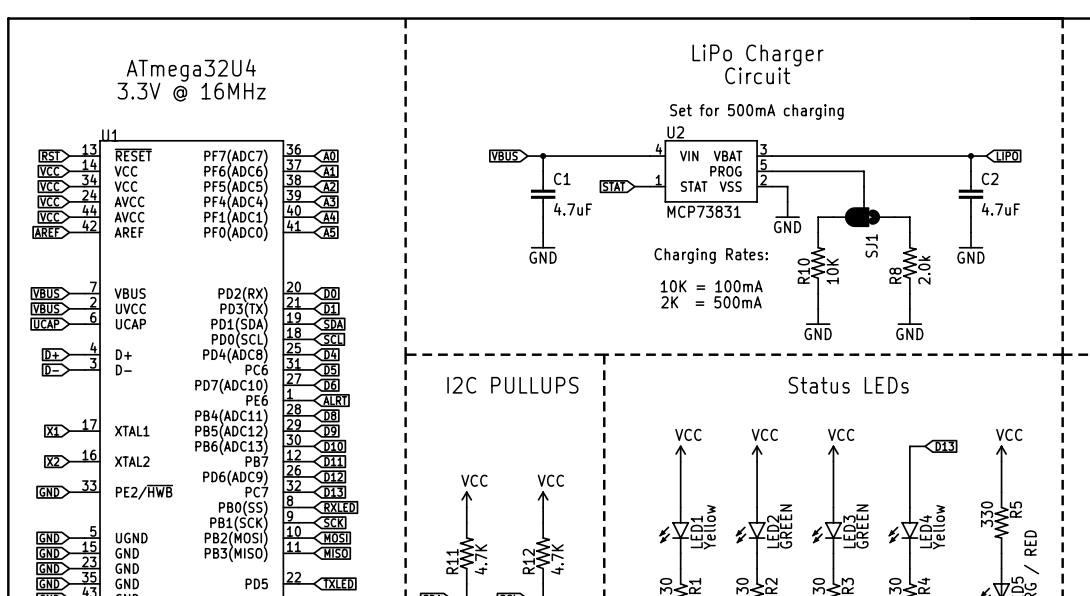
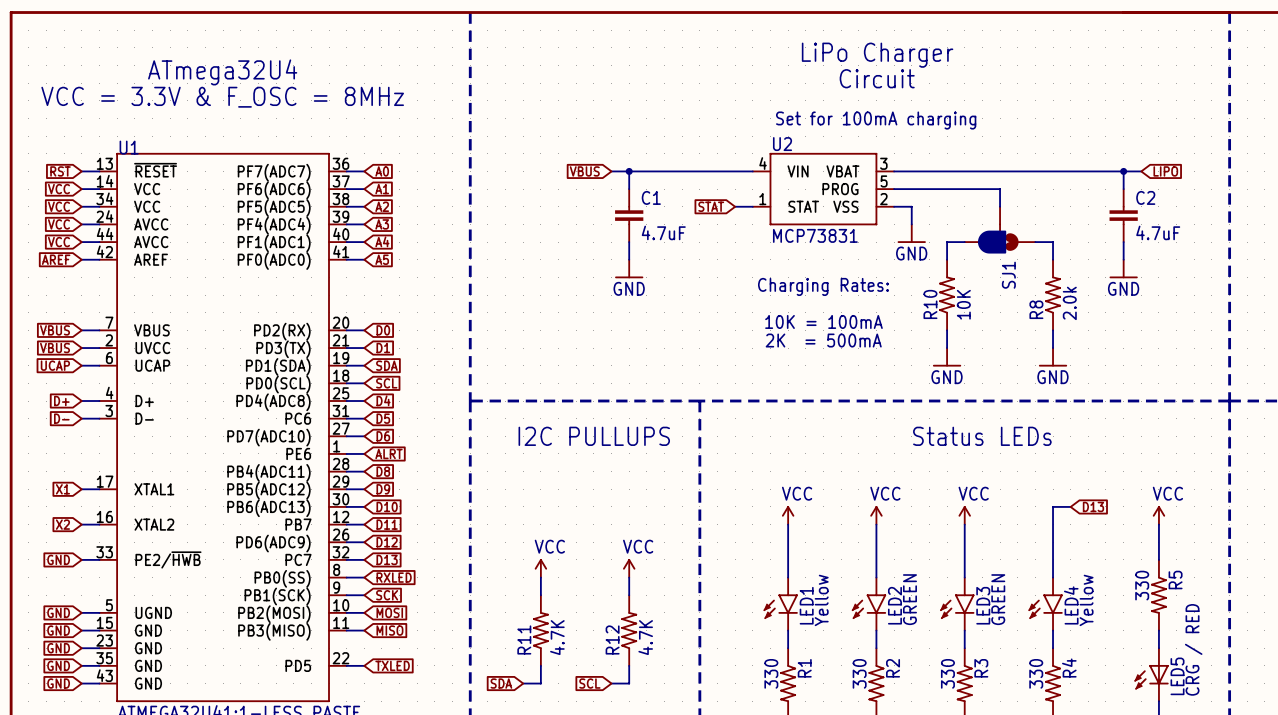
text: 3.3V @ 16MHz (191, 92) -> VCC = 3.3V & F_OSC = 8MHz (222, 97)
text: Set for 500mA charging (756, 111) -> Set for 100mA charging (876, 120)

